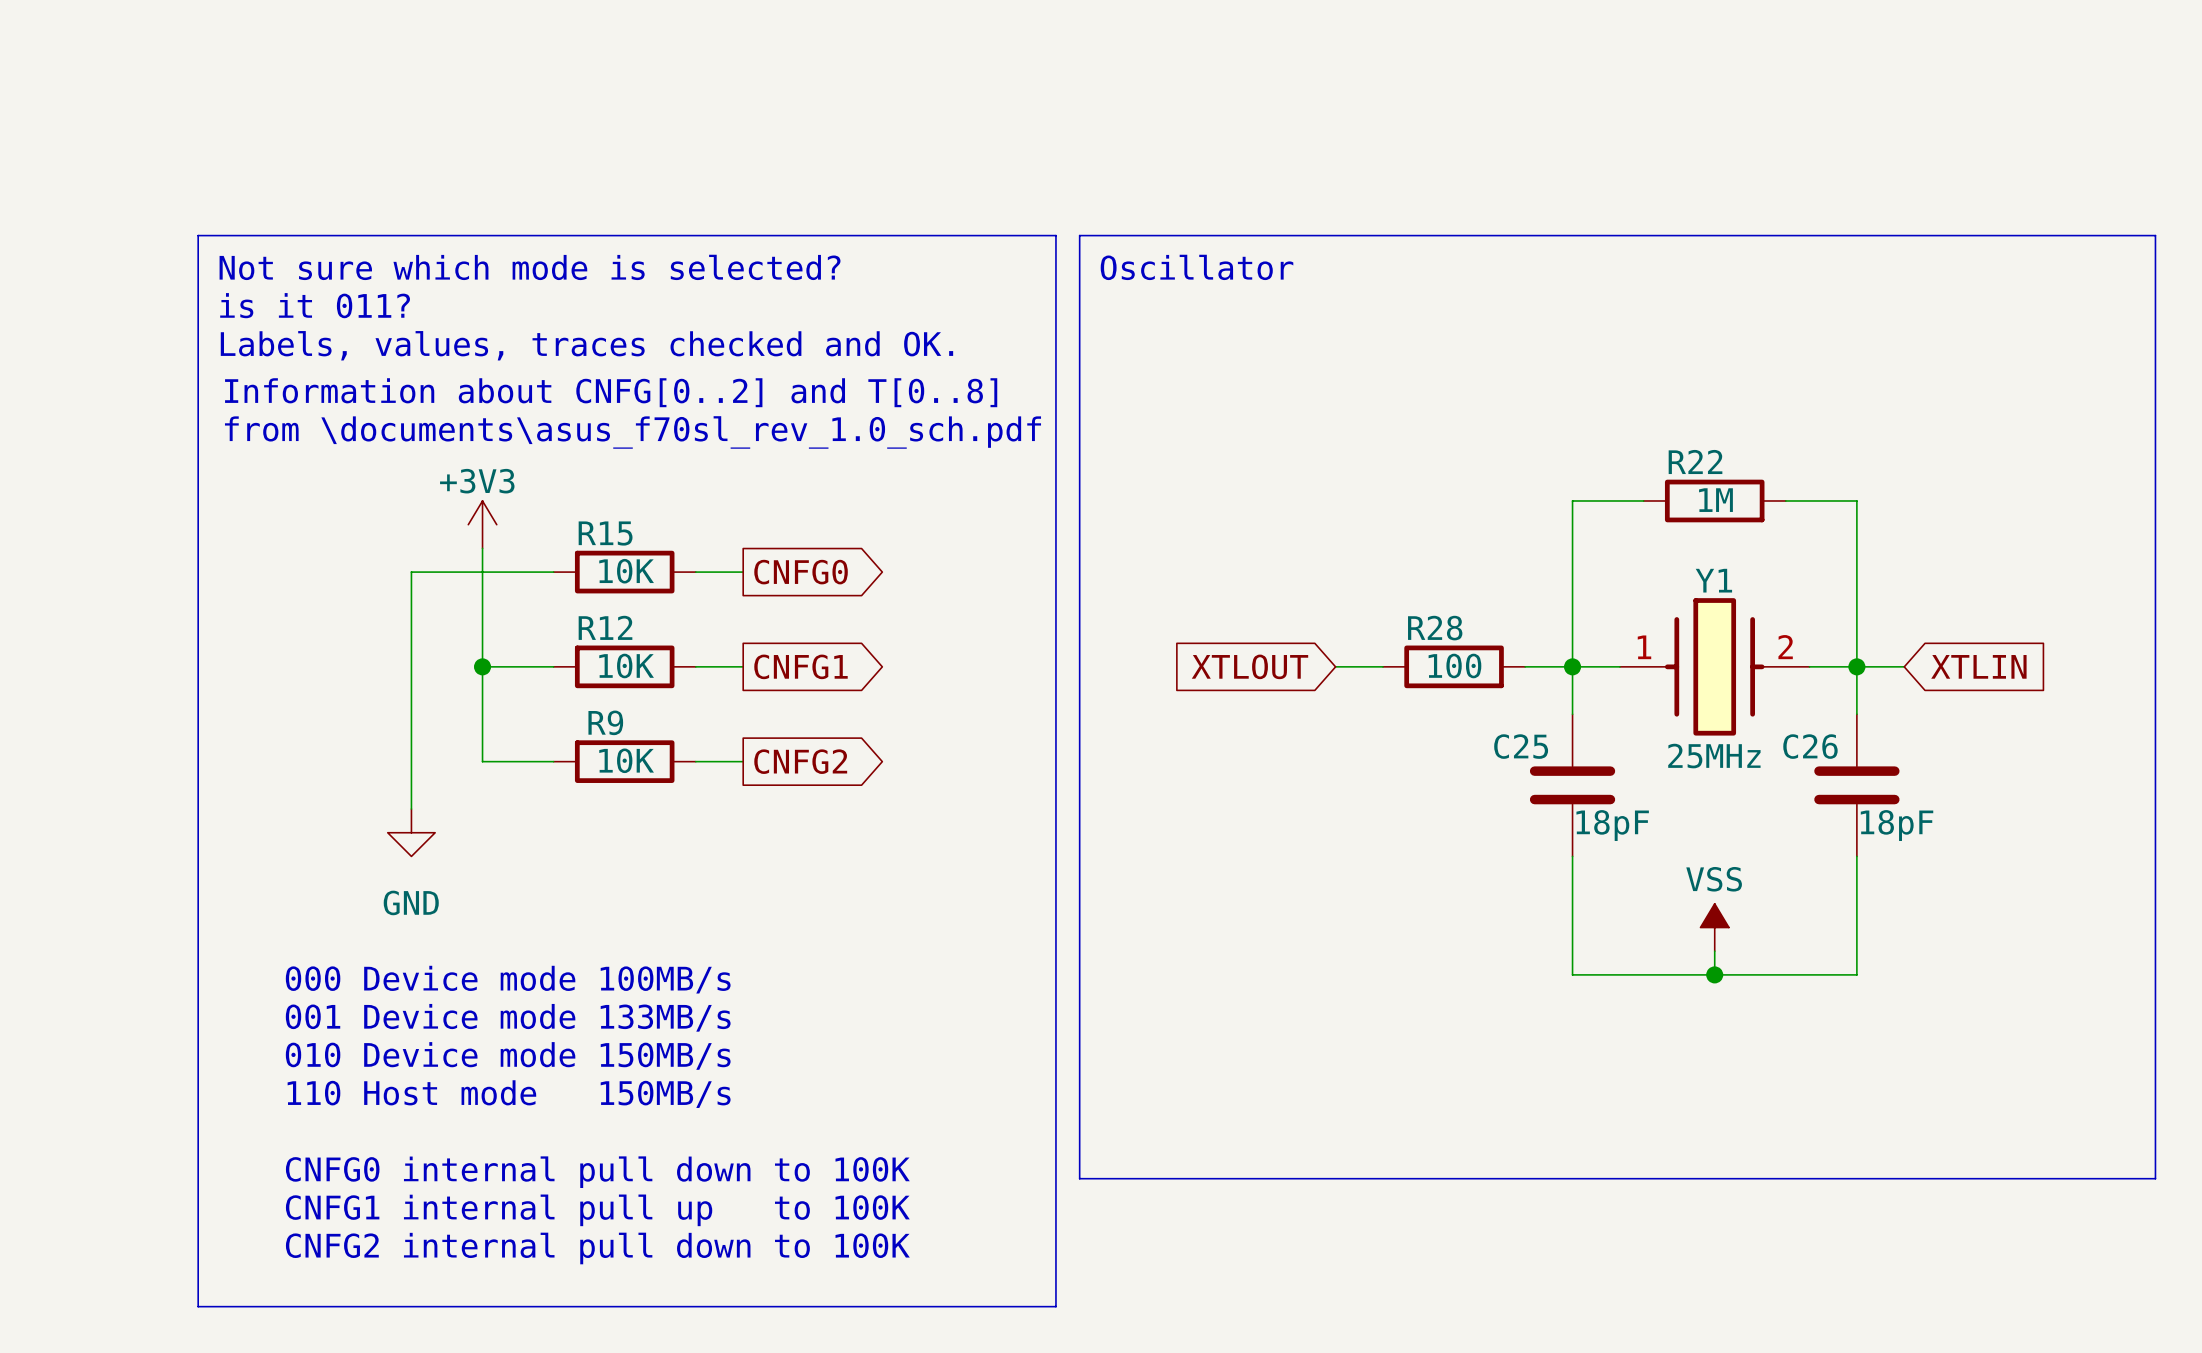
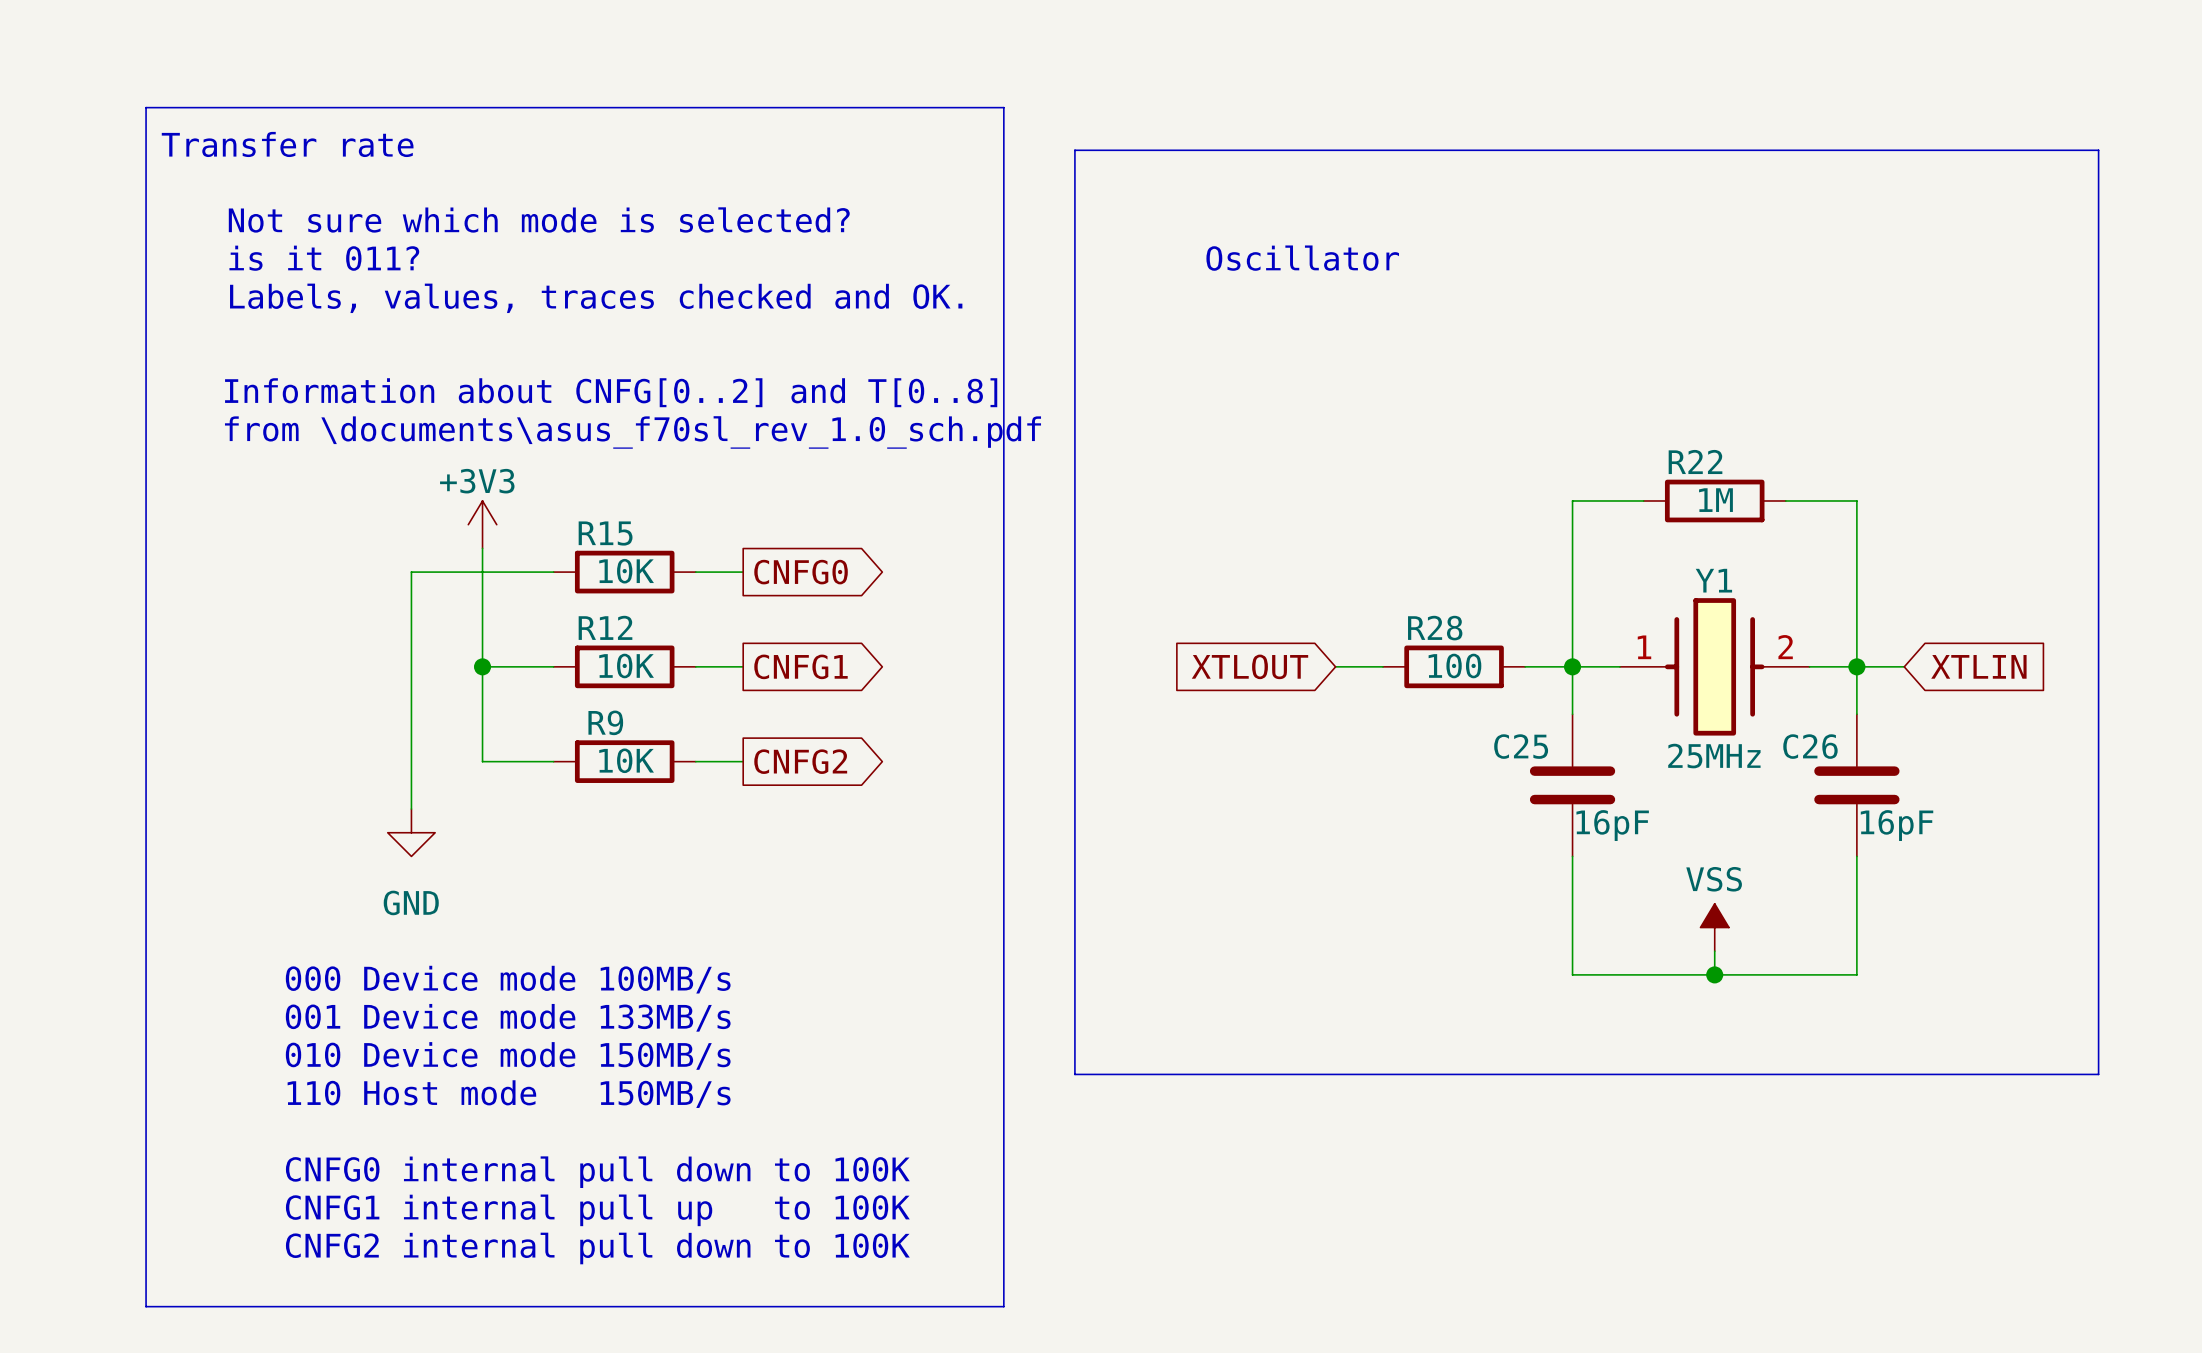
text: none -> Transfer rate (287, 144)
text: none -> Not sure which mode is selected? (539, 219)
line: (1079, 235) (2155, 235) (2155, 1178) (1079, 1178) (1079, 235) -> (1074, 150) (1074, 1074) (2098, 1074) (2098, 150) (1074, 150)
text: Not sure which mode is selected? (530, 267) -> is it 011? (324, 258)
text position: Oscillator (1197, 267) -> Oscillator (1302, 258)
text: is it 011? (315, 305) -> Labels, values, traces checked and OK. (596, 298)
text: Labels, values, traces checked and OK. (586, 345) -> none
C25 value: 18pF (1612, 825) -> 16pF (1612, 825)
C26 value: 18pF (1897, 825) -> 16pF (1897, 825)
line: (198, 1306) (198, 235) (1055, 235) (1055, 1306) (1003, 1306) -> (198, 1306) (146, 1306) (146, 107) (1003, 107) (1003, 1306)

